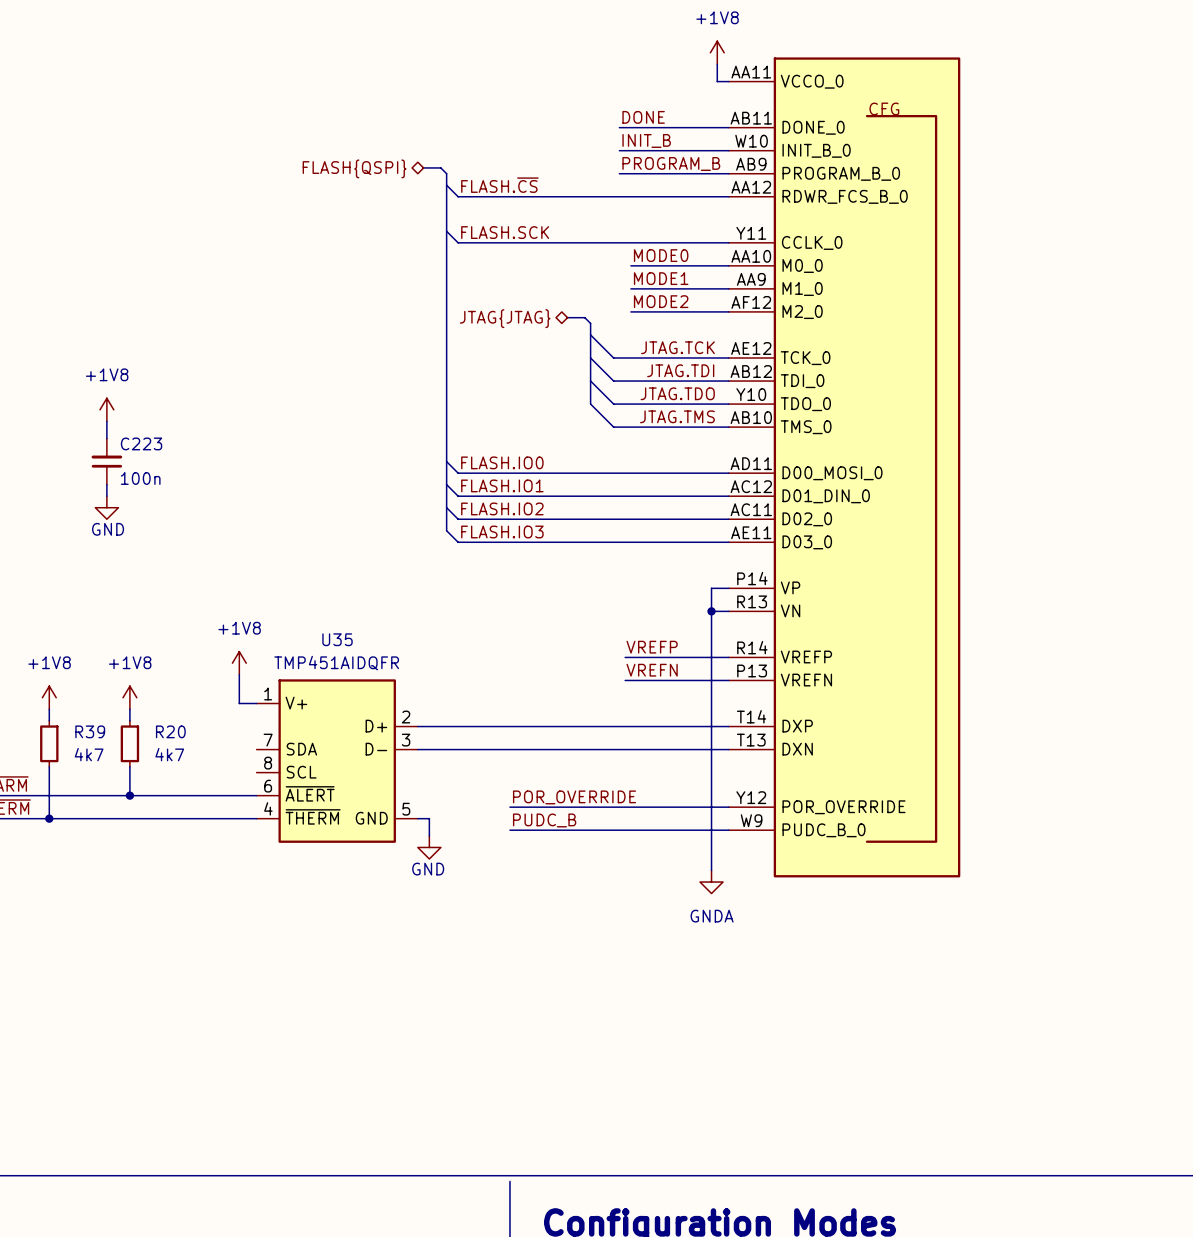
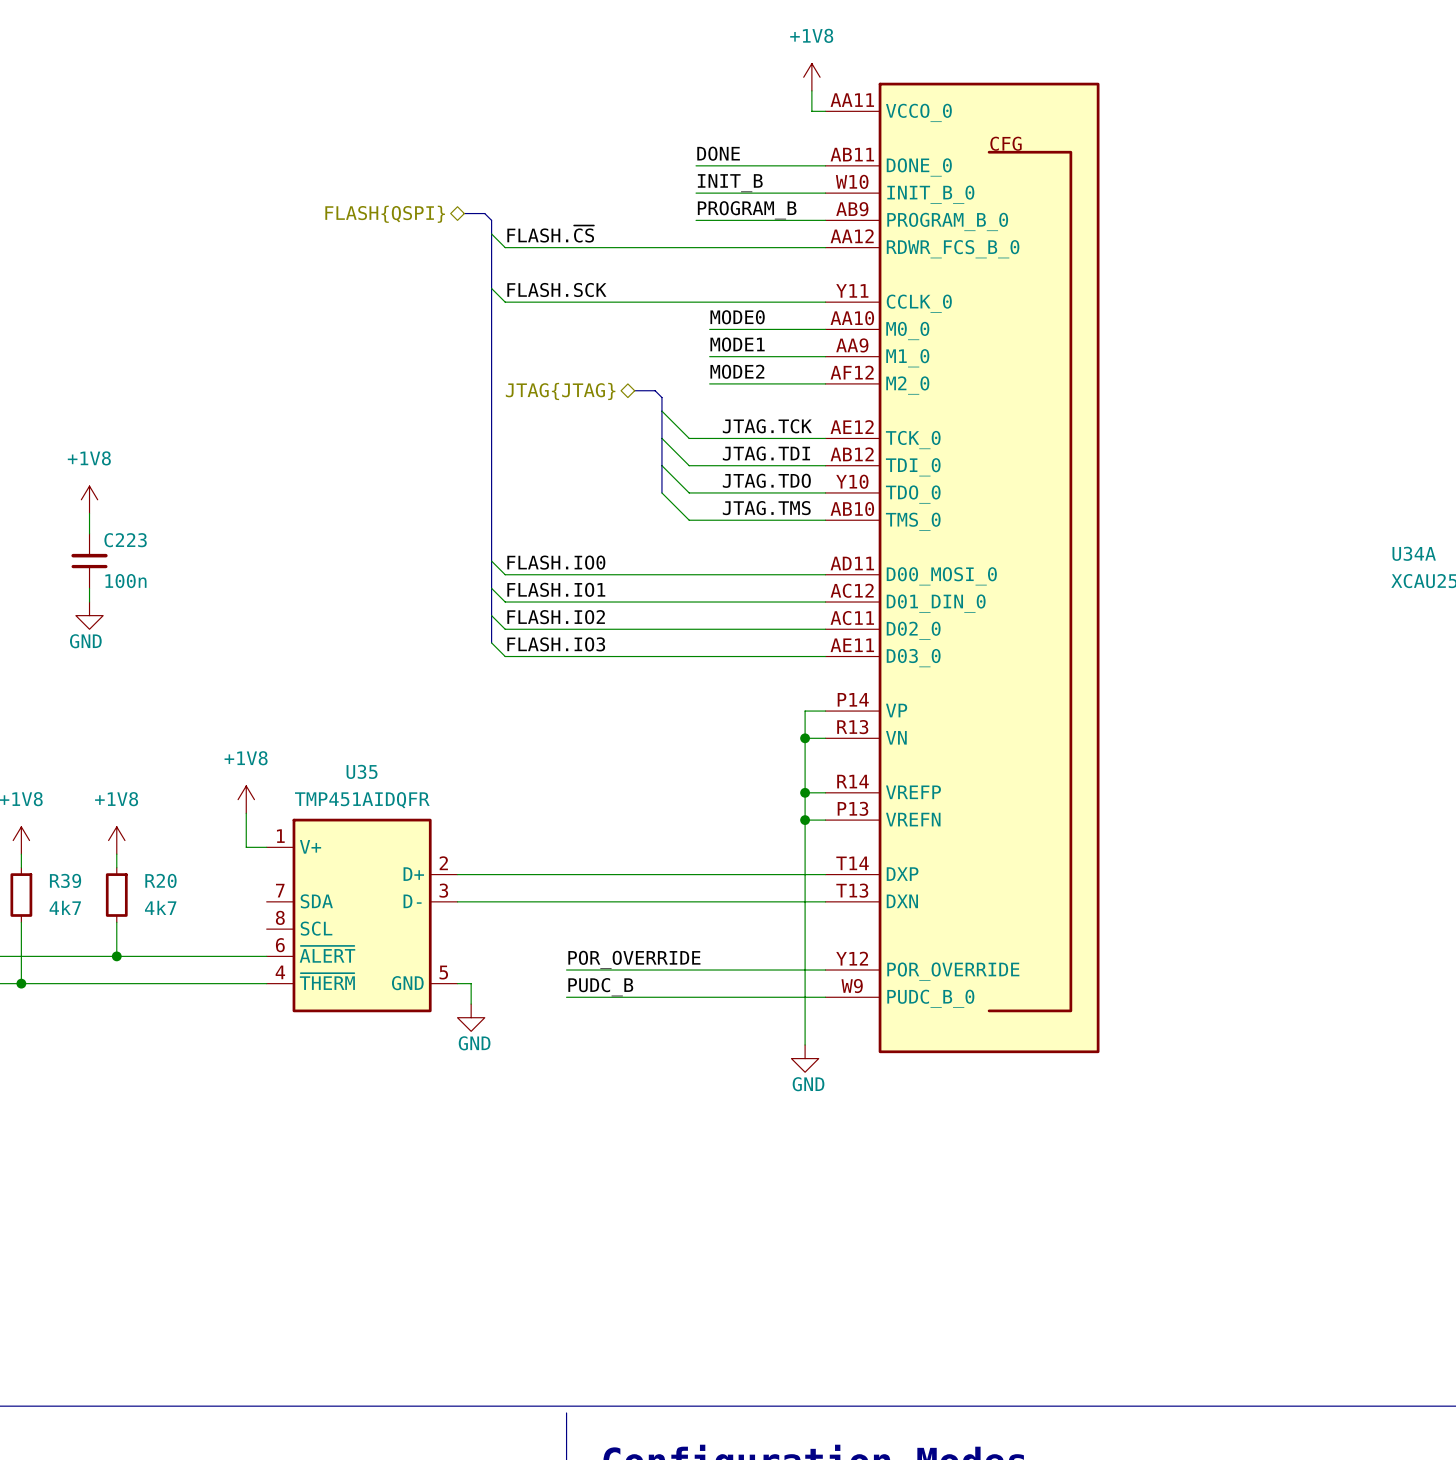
label: VREFP (652, 647) -> none
wire: (625, 657) (711, 657) -> none
junction: none -> (805, 792)
label: VREFN (652, 670) -> none
wire: (625, 680) (711, 680) -> none
junction: none -> (805, 820)
power symbol: GNDA (711, 882) -> GND (805, 1058)

